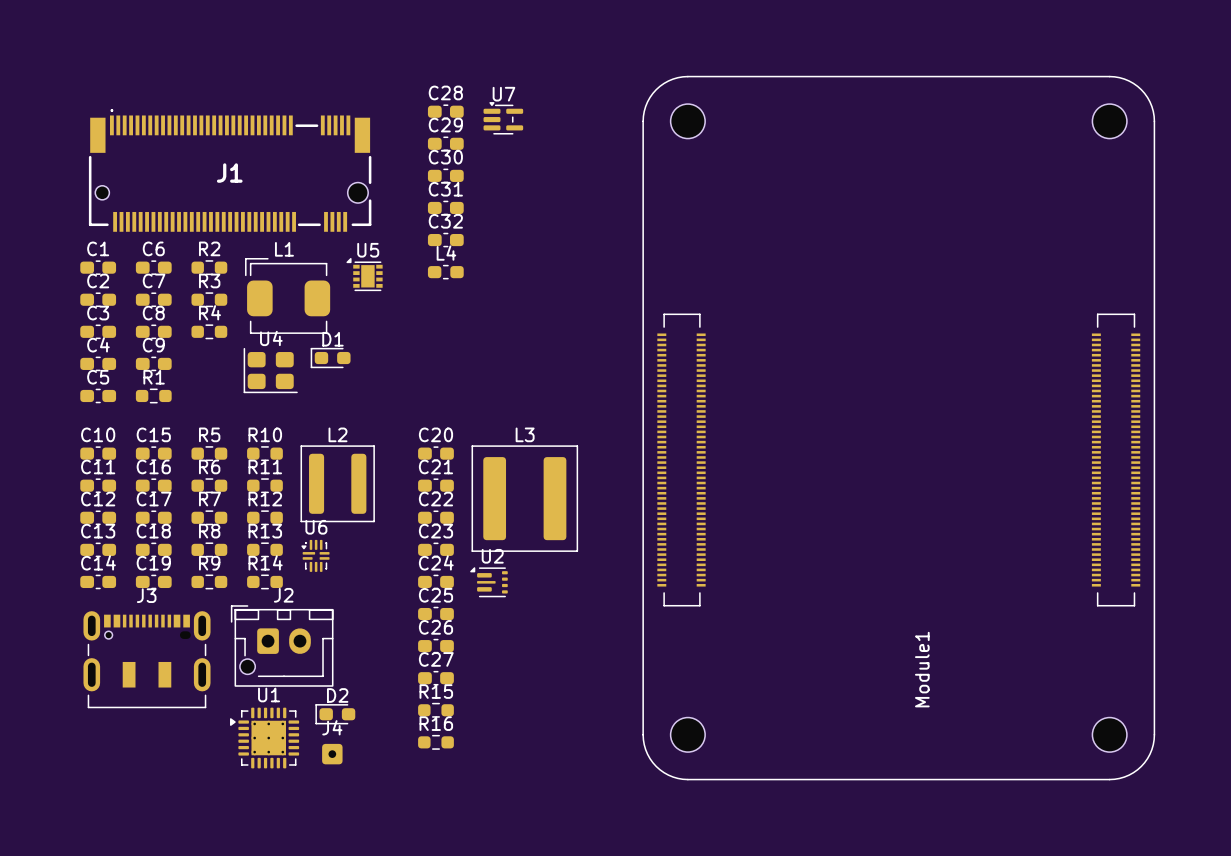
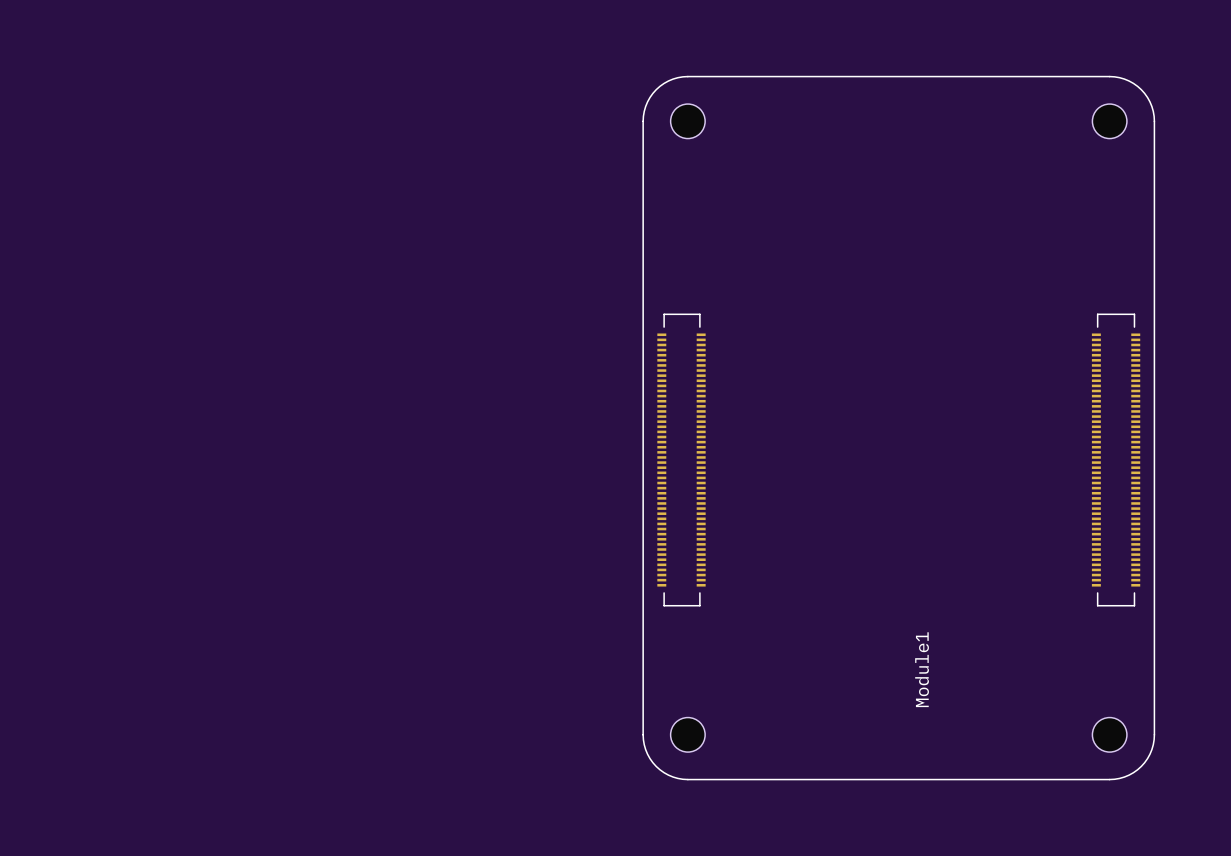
C28: (445, 111) -> none
U7: (503, 118) -> none
C29: (445, 143) -> none
J1: (230, 170) -> none
C30: (445, 175) -> none
C31: (445, 207) -> none
C32: (445, 240) -> none
C1: (98, 267) -> none
C6: (153, 267) -> none
R2: (209, 267) -> none
L4: (445, 272) -> none
U5: (364, 274) -> none
L1: (287, 295) -> none
C2: (98, 299) -> none
C7: (153, 299) -> none
R3: (209, 299) -> none
C3: (98, 331) -> none
C8: (153, 331) -> none
R4: (209, 331) -> none
D1: (330, 358) -> none
C4: (98, 363) -> none
C9: (153, 363) -> none
U4: (270, 370) -> none
C5: (98, 395) -> none
R1: (153, 395) -> none
C10: (98, 453) -> none
C15: (153, 453) -> none
R5: (209, 453) -> none
R10: (264, 453) -> none
C20: (435, 453) -> none
L2: (337, 483) -> none
C11: (98, 485) -> none
C16: (153, 485) -> none
R6: (209, 485) -> none
R11: (264, 485) -> none
C21: (435, 485) -> none
L3: (524, 498) -> none
C12: (98, 517) -> none
C17: (153, 517) -> none
R7: (209, 517) -> none
R12: (264, 517) -> none
C22: (435, 517) -> none
C13: (98, 549) -> none
C18: (153, 549) -> none
R8: (209, 549) -> none
R13: (264, 549) -> none
C23: (435, 549) -> none
U6: (315, 555) -> none
C14: (98, 581) -> none
C19: (153, 581) -> none
R9: (209, 581) -> none
R14: (264, 581) -> none
C24: (435, 581) -> none
U2: (488, 582) -> none
C25: (435, 614) -> none
J2: (282, 645) -> none
C26: (435, 646) -> none
J3: (147, 659) -> none
C27: (435, 678) -> none
R15: (435, 710) -> none
D2: (335, 714) -> none
U1: (264, 738) -> none
R16: (435, 742) -> none
J4: (332, 754) -> none

